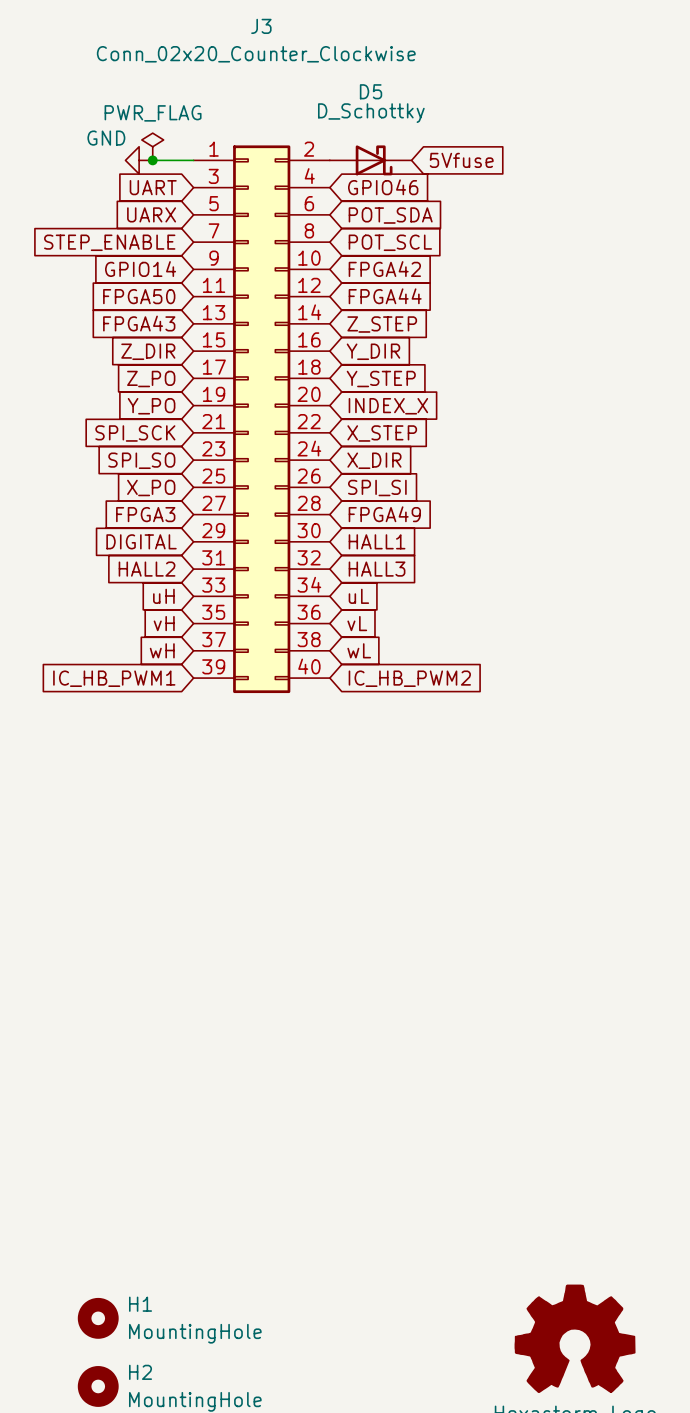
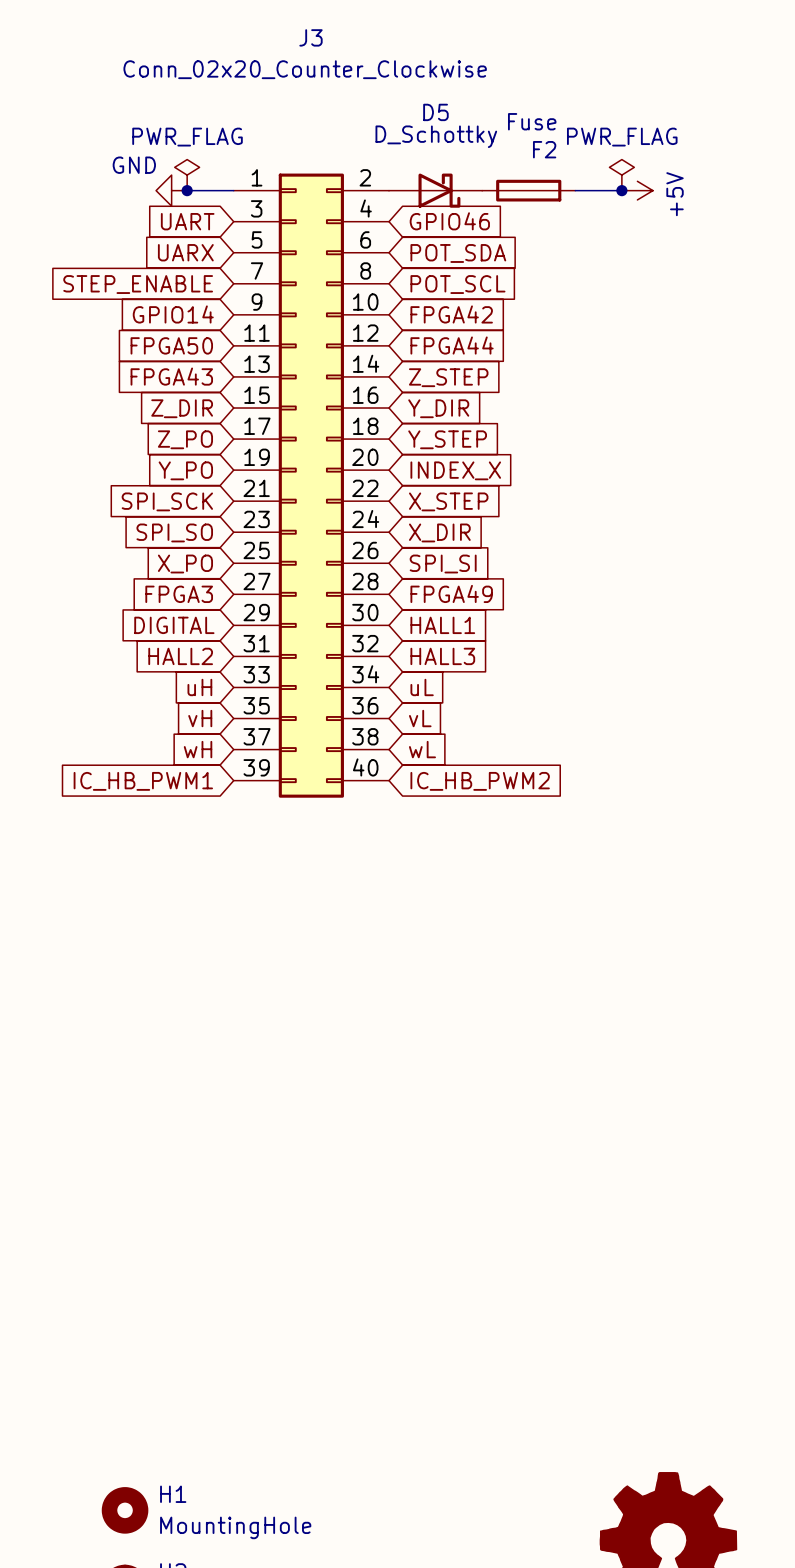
power symbol: none -> PWR_FLAG (621, 175)
F2: none -> Fuse (528, 190)
global label: 5Vfuse (461, 160) -> none
wire: none -> (575, 190) (621, 190)
junction: none -> (621, 190)
power symbol: none -> +5V (637, 190)

